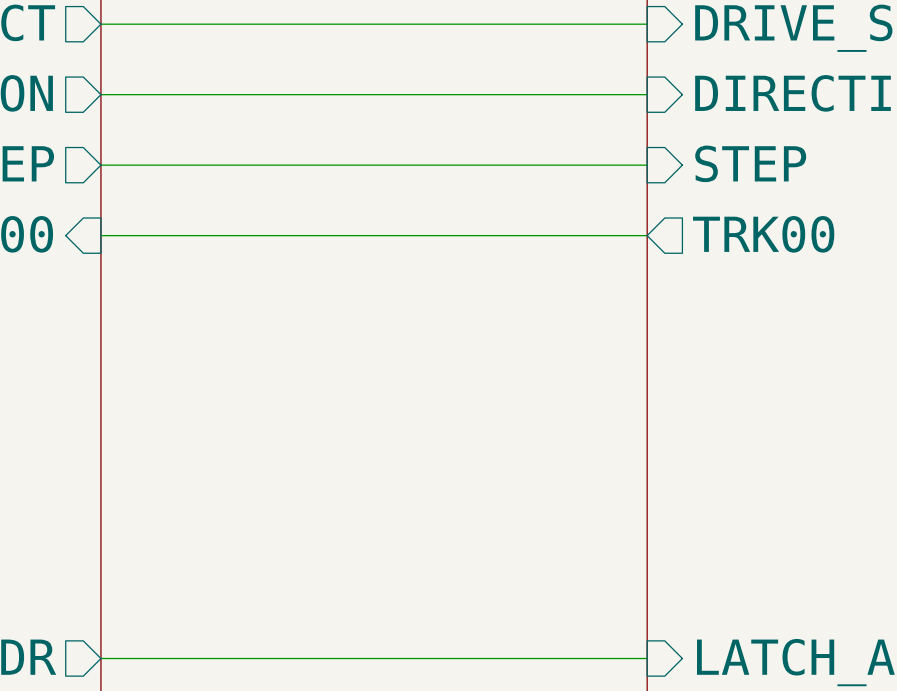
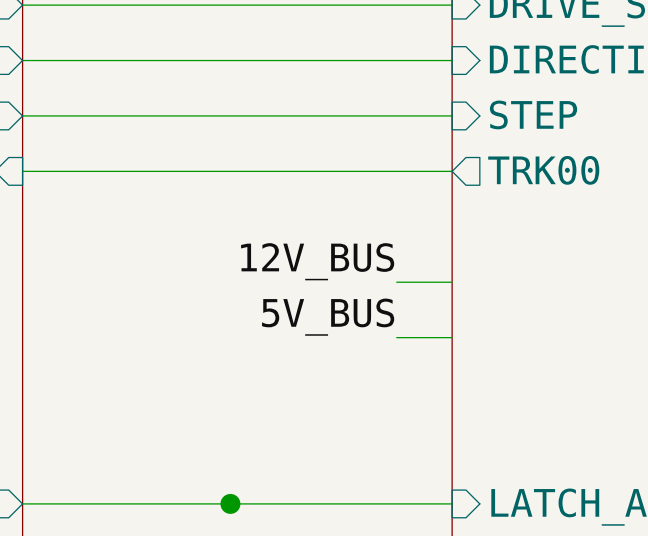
label: none -> 12V_BUS (317, 261)
wire: none -> (396, 282) (452, 282)
label: none -> 5V_BUS (328, 317)
wire: none -> (396, 337) (452, 337)
junction: none -> (230, 503)

